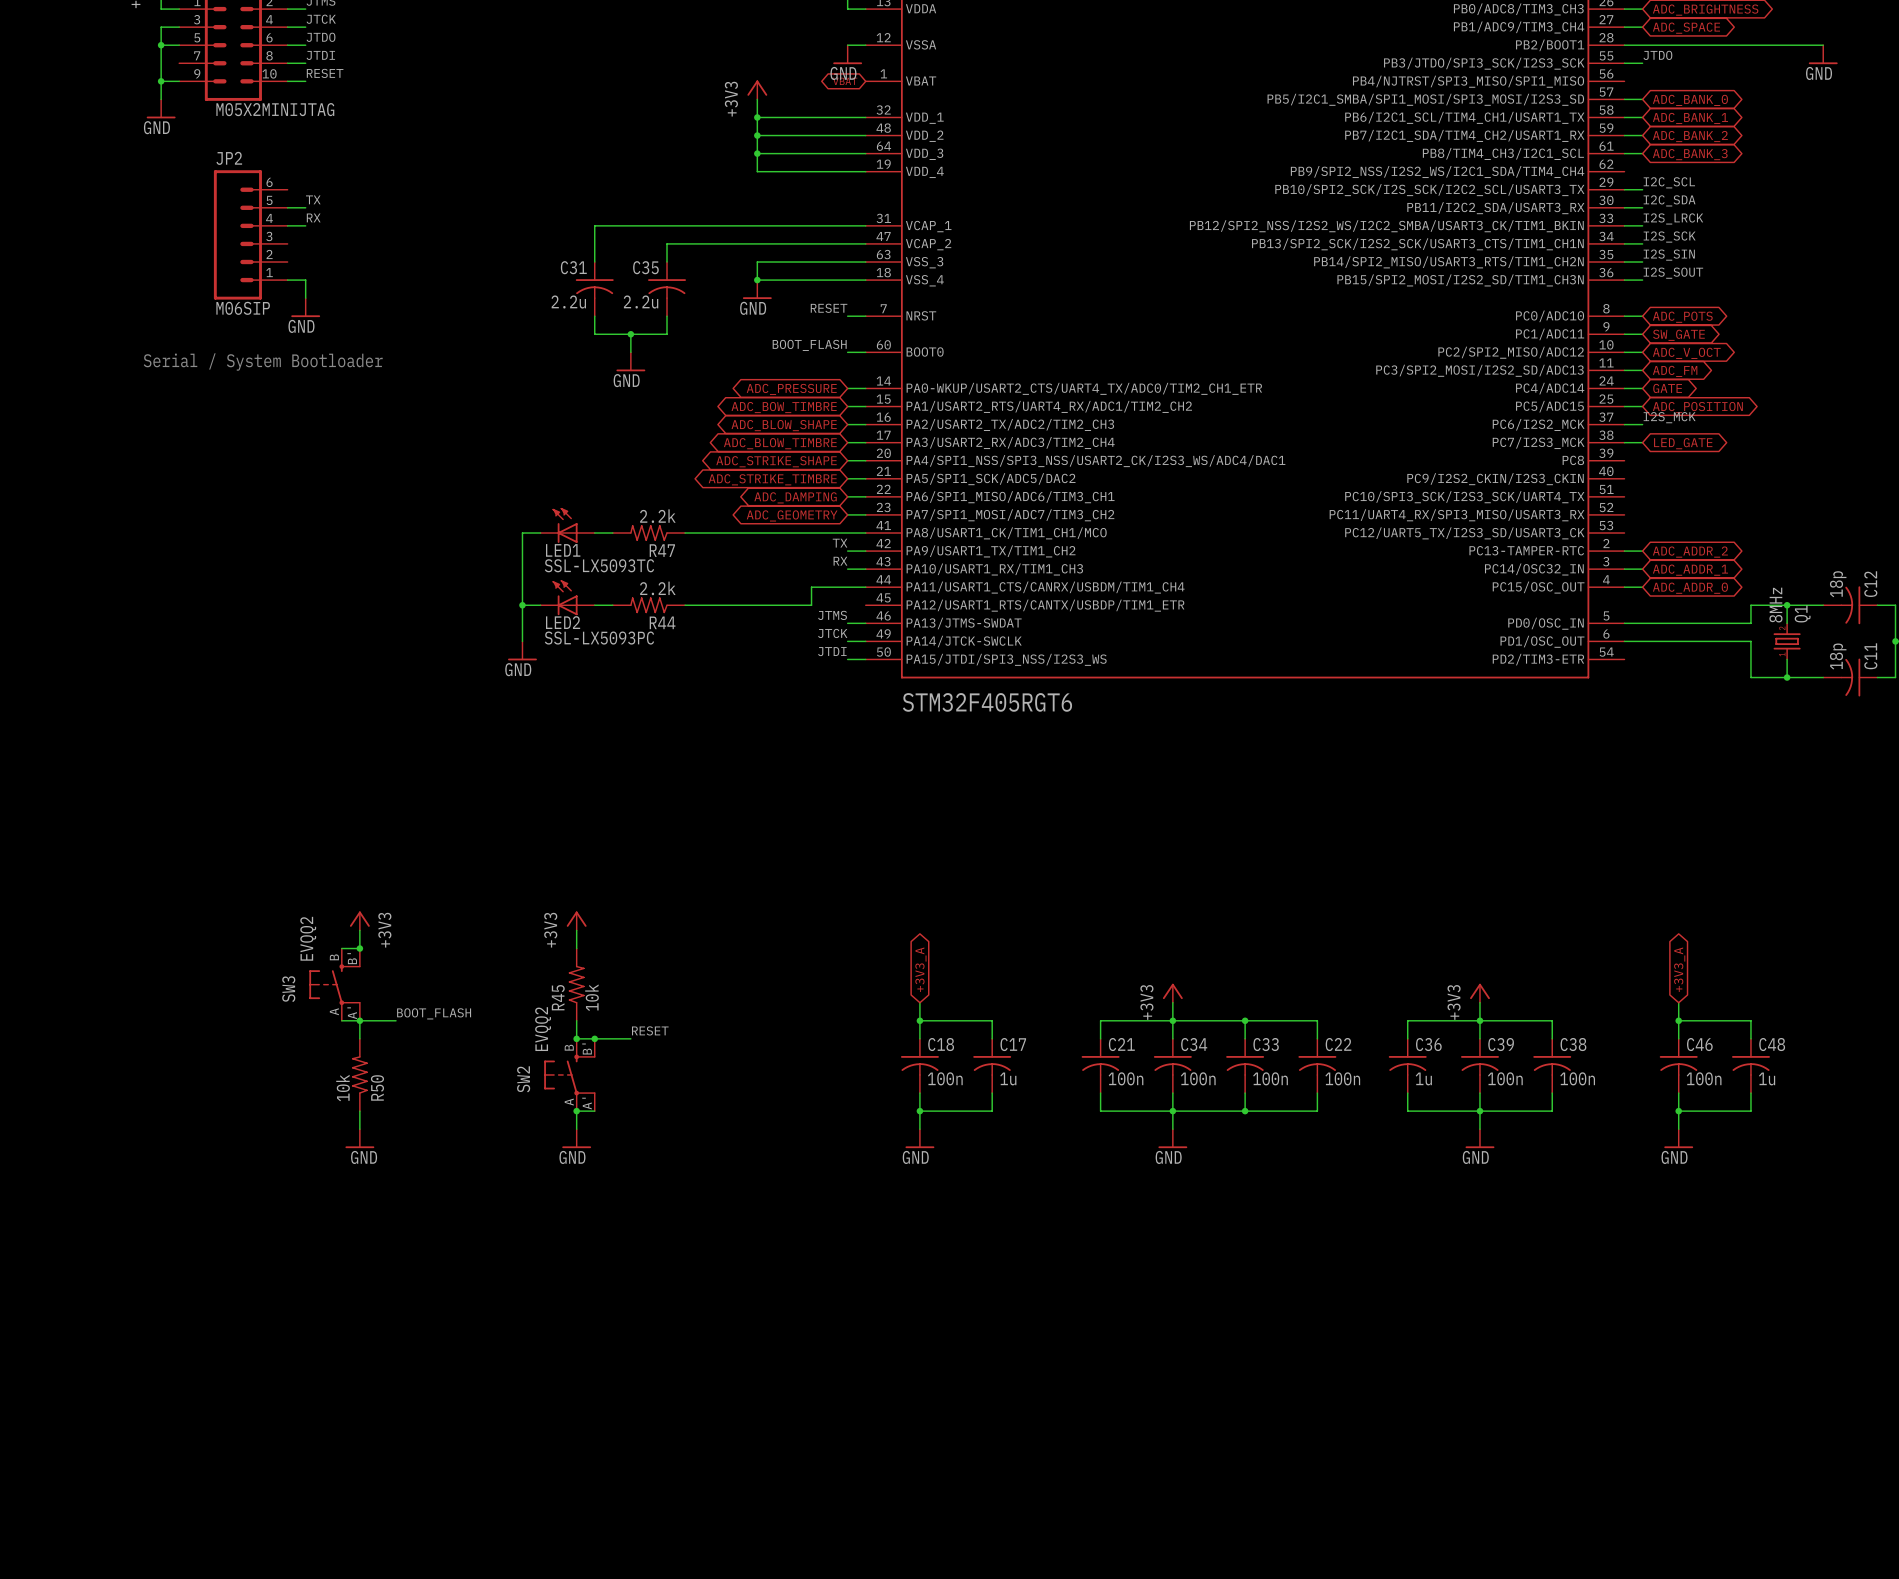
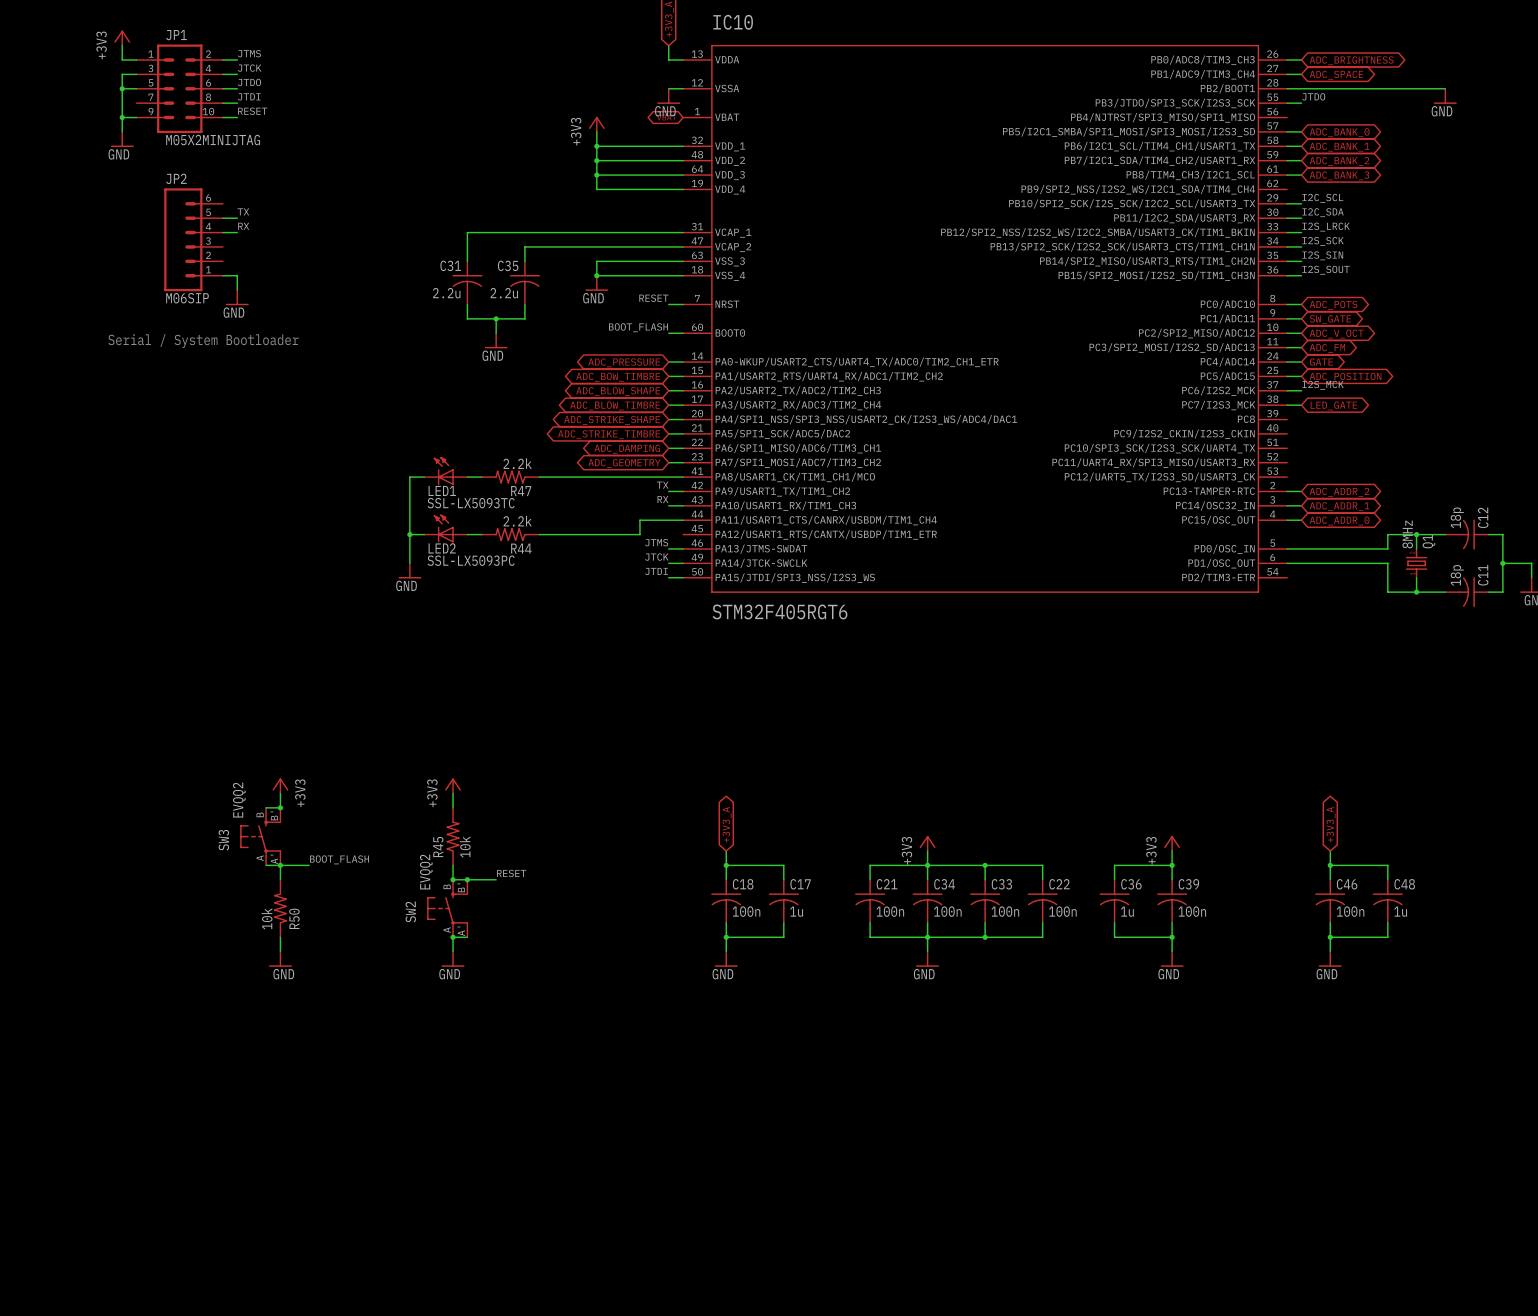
wire: (1479, 1020) (1552, 1020) (1552, 1038) -> none
C38: 100n (1552, 1065) -> none
wire: (1552, 1093) (1552, 1111) (1479, 1111) -> none

